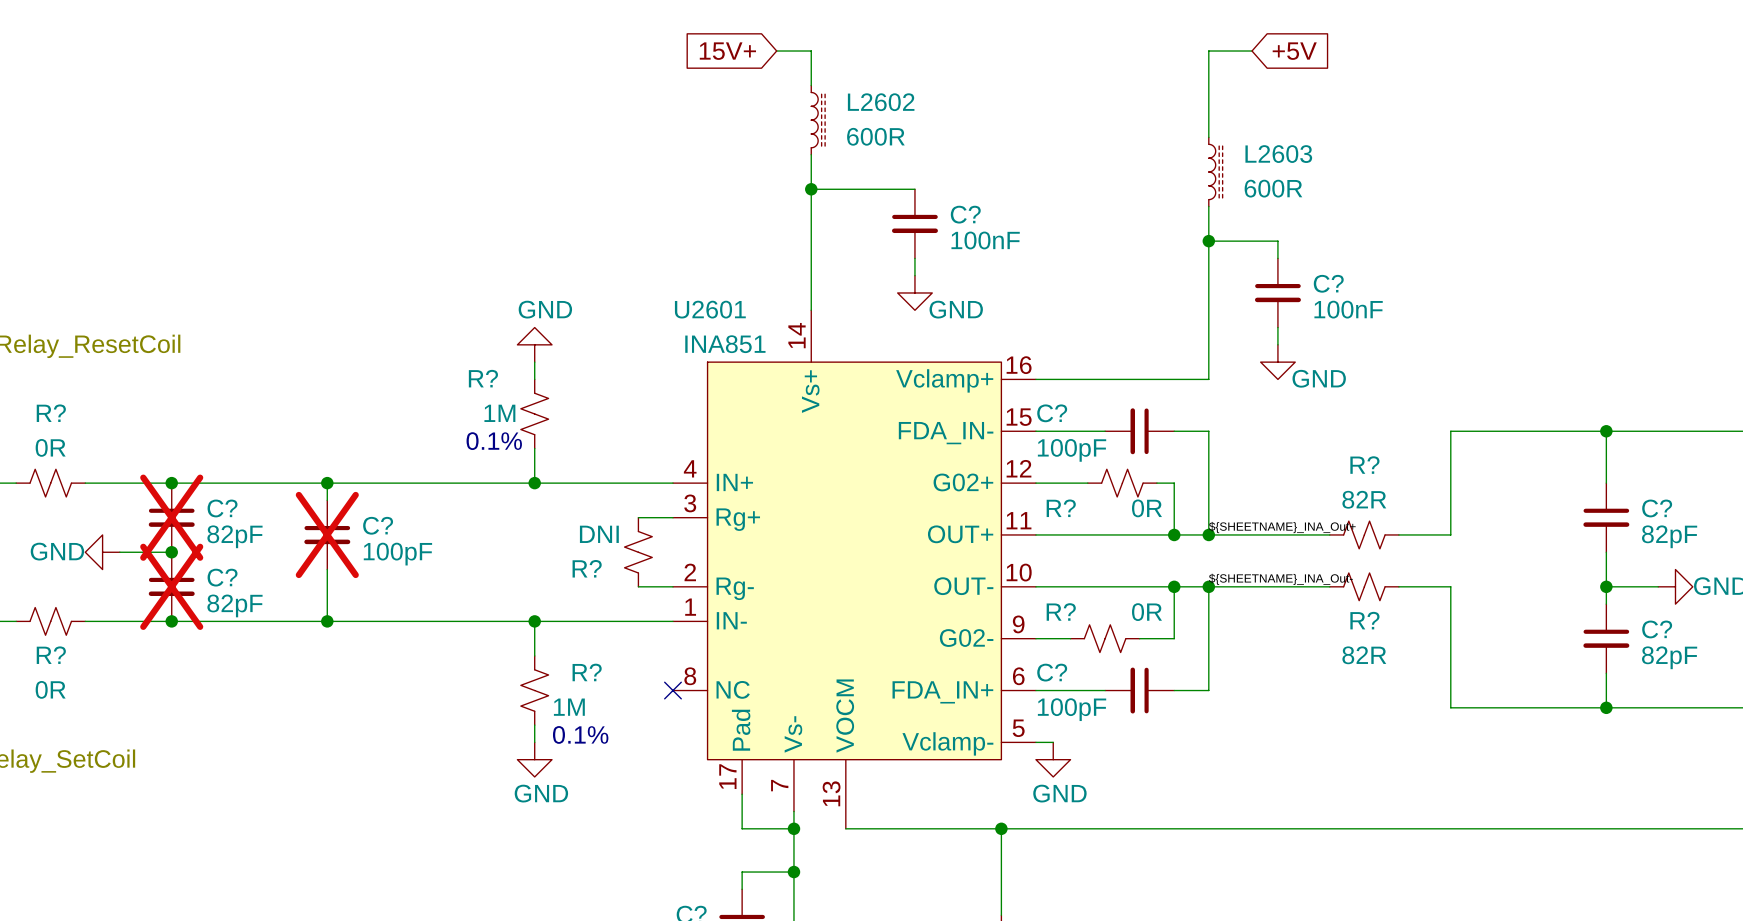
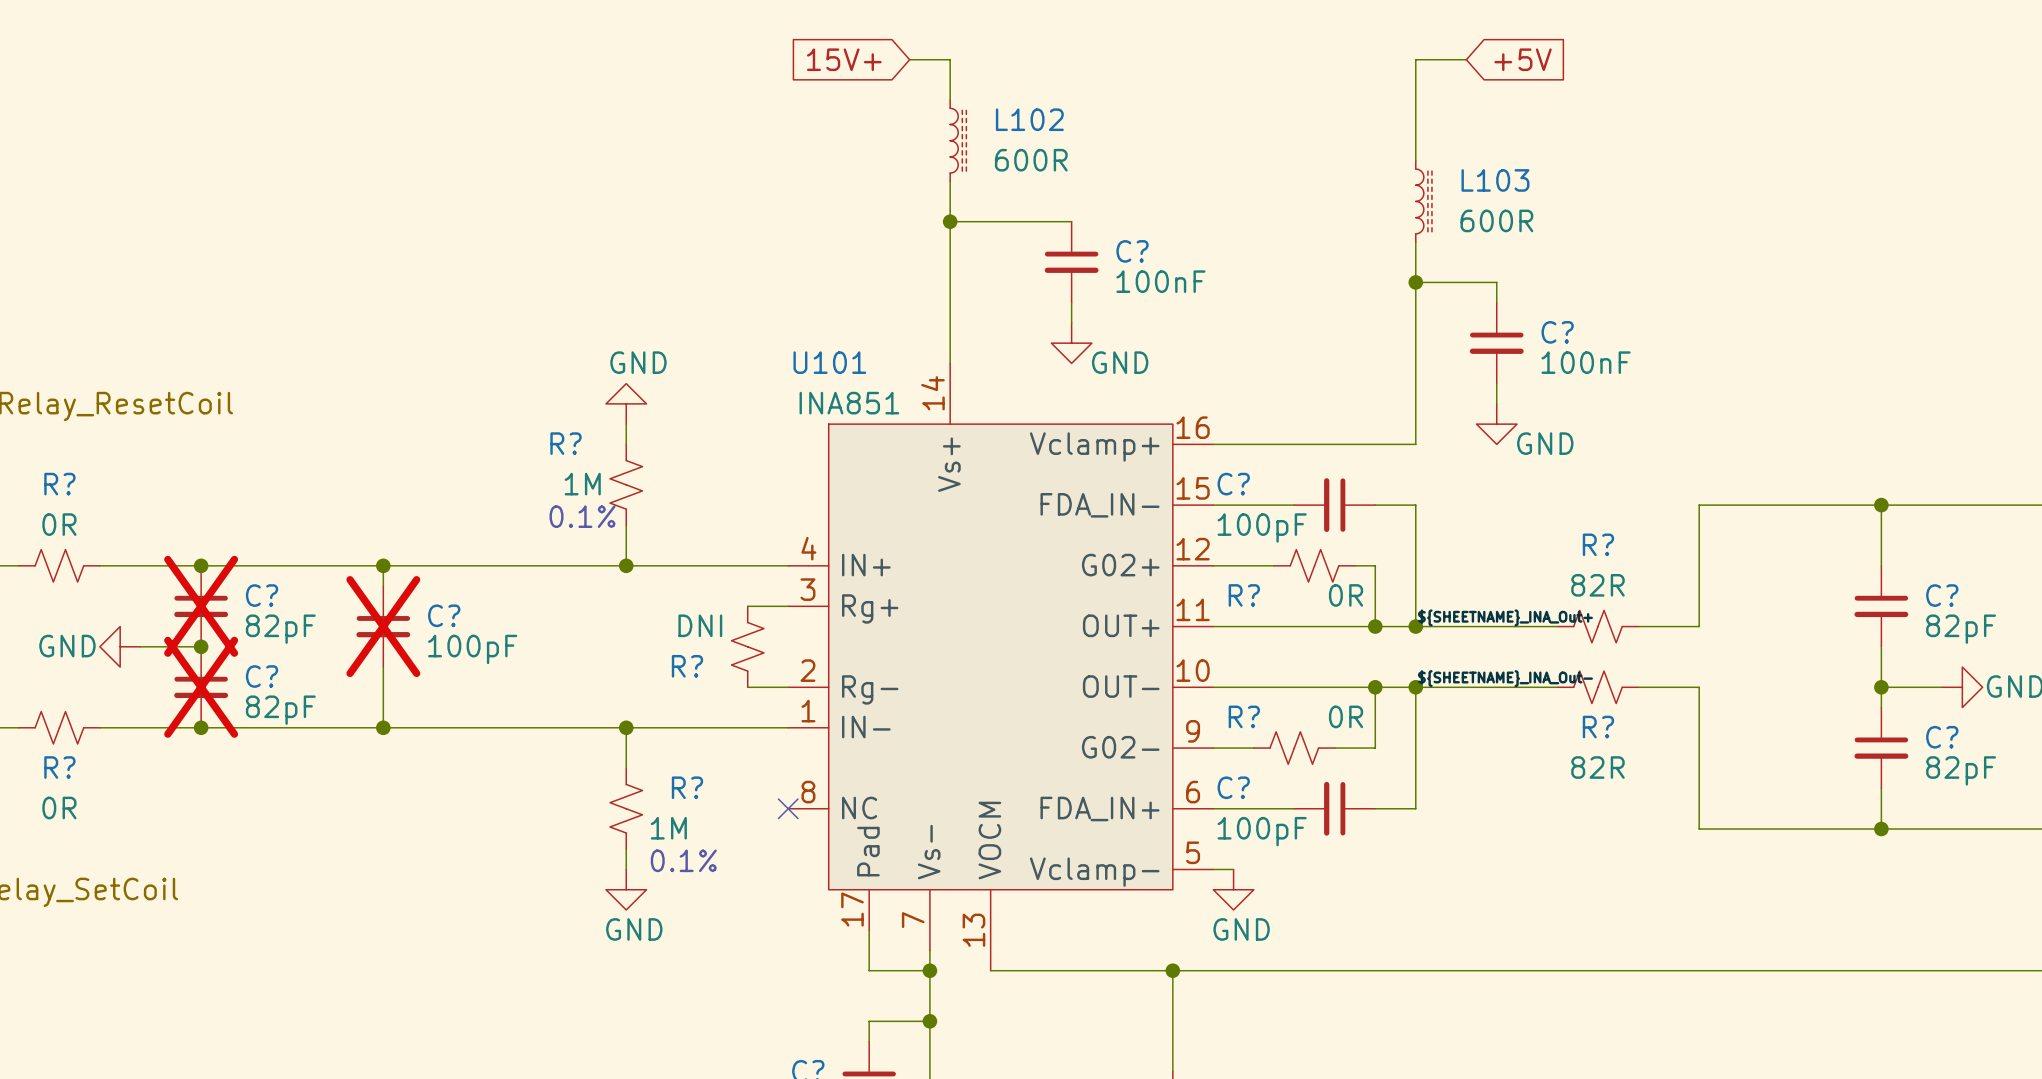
L2602 name: L2602 (881, 102) -> L102 (1029, 119)
L2603 name: L2603 (1278, 154) -> L103 (1495, 180)
U2601 name: U2601 (710, 309) -> U101 (829, 362)

